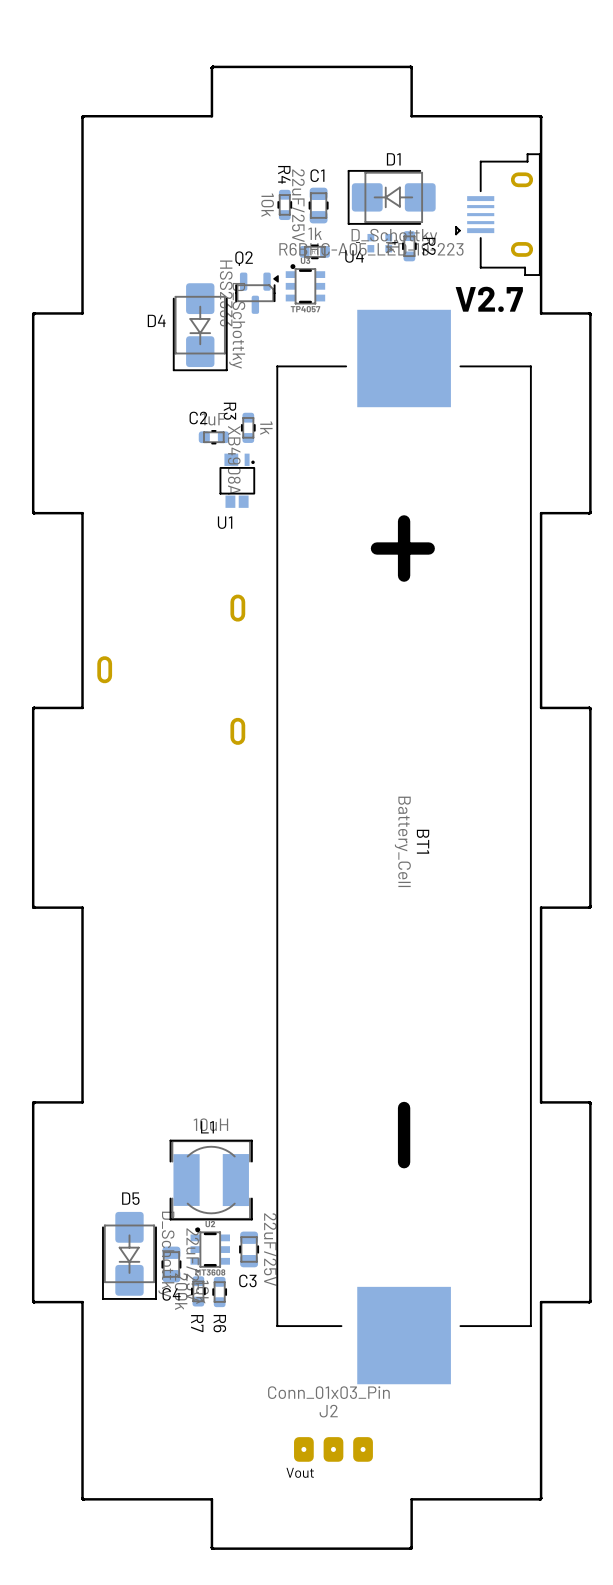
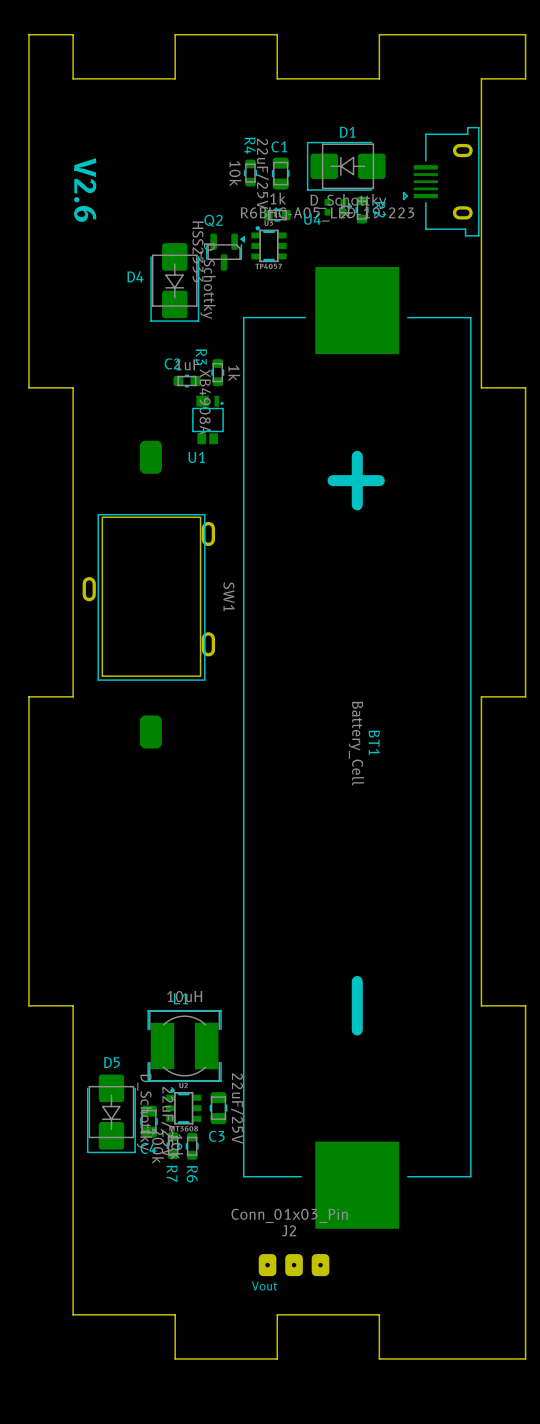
board edge: none -> (525, 34) (525, 78) (481, 78) (481, 387) (525, 387) (525, 696) (481, 696) (481, 1005) (525, 1005) (525, 1358) (379, 1358) (379, 1314) (277, 1314) (277, 1358) (175, 1358) (175, 1314) (73, 1314) (73, 1005) (28, 1005) (28, 696) (73, 696) (73, 387) (28, 387) (28, 34) (73, 34) (73, 78) (175, 78) (175, 34) (277, 34) (277, 78) (379, 78) (379, 34) (525, 34)
board edge: (410, 66) (213, 66) -> none
board edge: (211, 68) (211, 116) (83, 116) -> none
board edge: (411, 68) (411, 116) (539, 116) -> none
board edge: (82, 117) (82, 313) (34, 313) -> none
board edge: (541, 117) (541, 313) (589, 313) -> none
text: none -> V2.6 (85, 190)
text: V2.7 (489, 299) -> none
board edge: (33, 314) (33, 511) -> none
board edge: (590, 314) (590, 511) -> none
board edge: (34, 513) (82, 513) (82, 707) (34, 707) -> none
board edge: (589, 513) (541, 513) (541, 707) (589, 707) -> none
SW1: none -> (151, 594)
board edge: (33, 709) (33, 906) -> none
board edge: (590, 709) (590, 906) -> none
board edge: (34, 907) (82, 907) (82, 1102) (34, 1102) -> none
board edge: (589, 907) (541, 907) (541, 1102) (589, 1102) -> none
board edge: (33, 1103) (33, 1300) -> none
board edge: (590, 1103) (590, 1300) -> none
board edge: (34, 1302) (82, 1302) (82, 1498) -> none
board edge: (589, 1302) (541, 1302) (541, 1498) -> none
J2 position: (333, 1449) -> (294, 1265)
board edge: (83, 1499) (211, 1499) (211, 1547) -> none
board edge: (539, 1499) (411, 1499) (411, 1547) -> none
board edge: (410, 1548) (213, 1548) -> none

